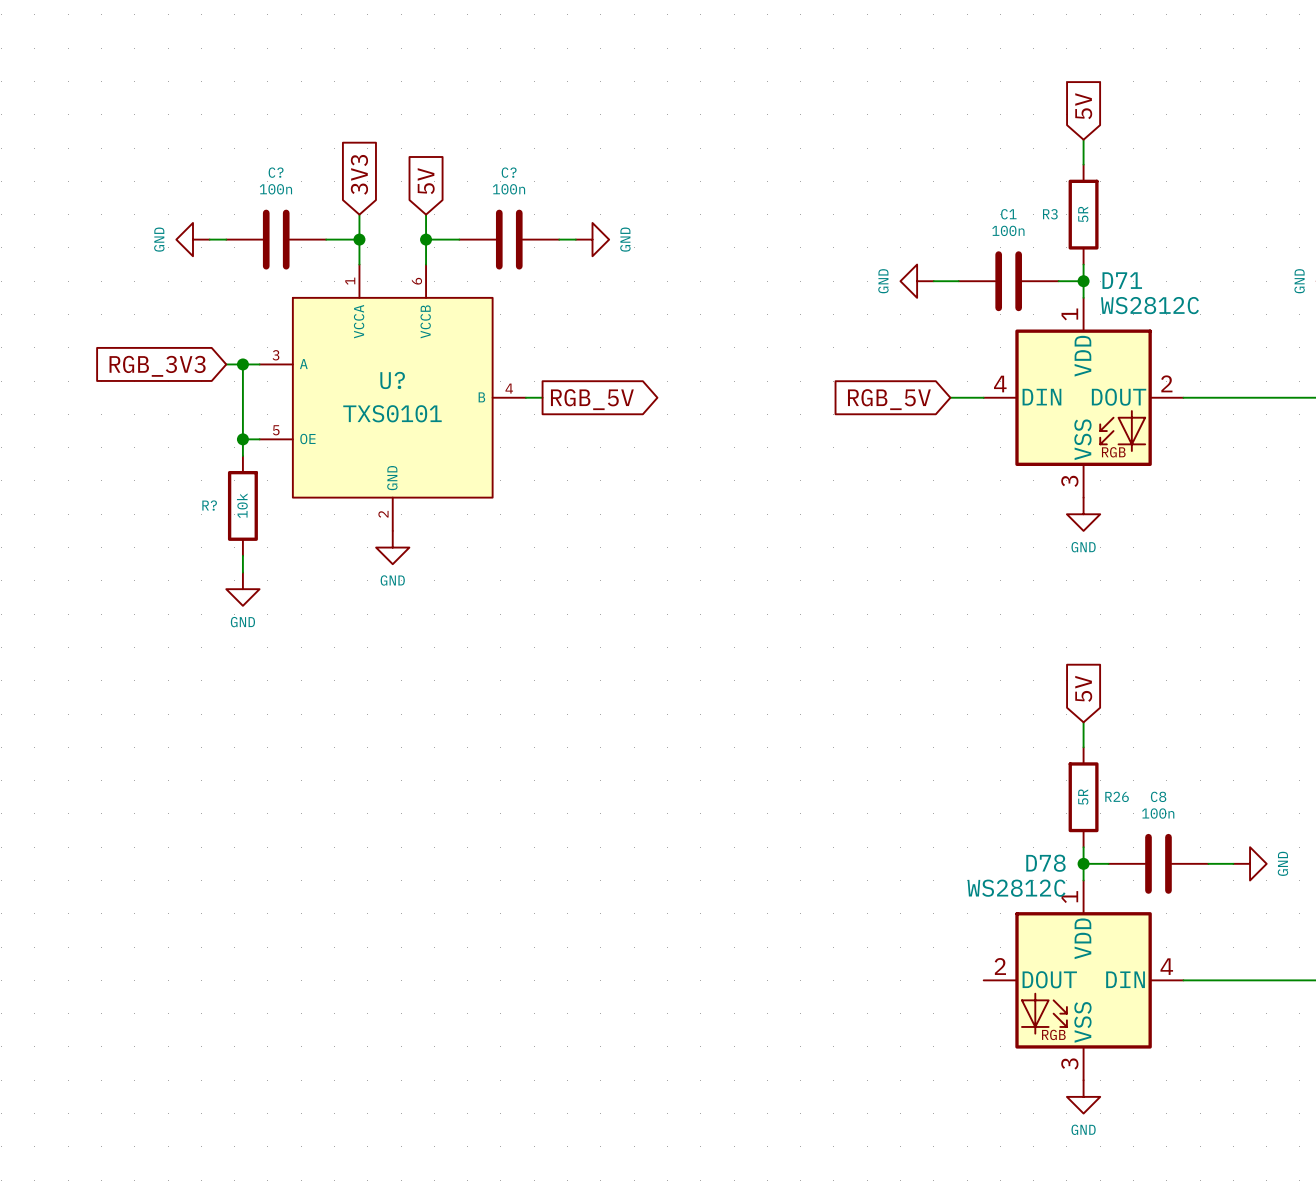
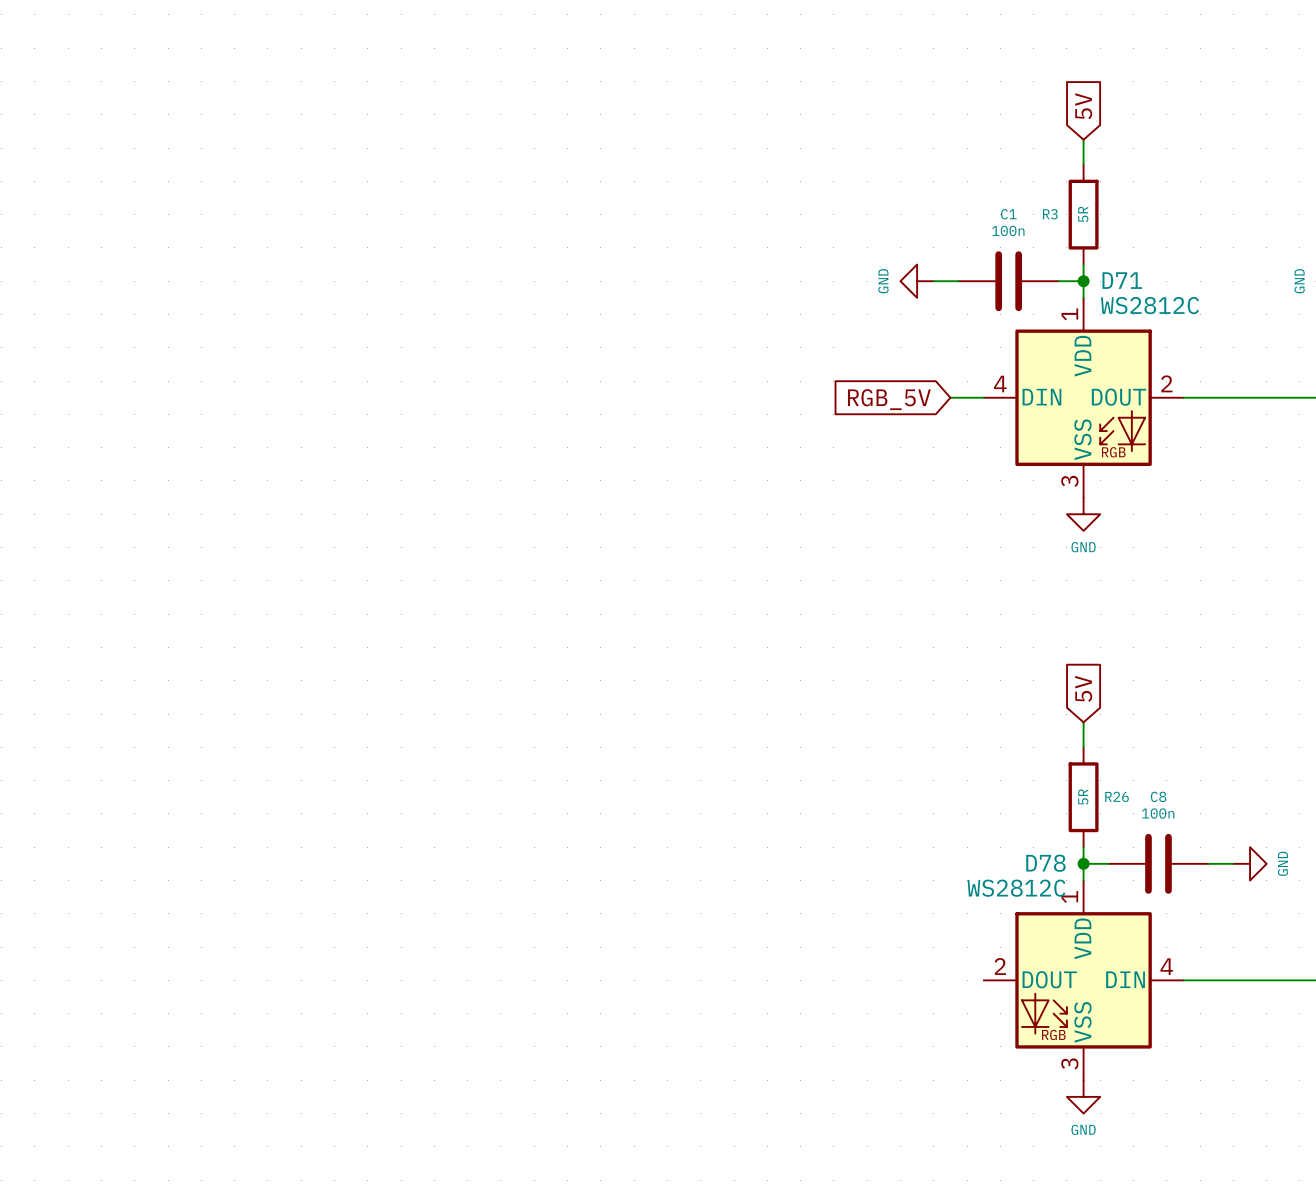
global label: 3V3 (359, 174) -> none
global label: 5V (426, 181) -> none
wire: (359, 214) (359, 264) -> none
wire: (426, 214) (426, 264) -> none
power symbol: GND (192, 239) -> none
wire: (209, 239) (226, 239) -> none
C?: 100n (276, 239) -> none
wire: (326, 239) (359, 239) -> none
junction: (359, 239) -> none
wire: (426, 239) (459, 239) -> none
junction: (426, 239) -> none
C?: 100n (509, 239) -> none
wire: (559, 239) (575, 239) -> none
power symbol: GND (592, 239) -> none
wire: (226, 364) (259, 364) -> none
wire: (242, 364) (242, 456) -> none
junction: (242, 364) -> none
global label: RGB_3V3 (157, 366) -> none
U?: TXS0101 (392, 397) -> none
wire: (525, 397) (542, 397) -> none
global label: RGB_5V (592, 399) -> none
wire: (242, 439) (259, 439) -> none
junction: (242, 439) -> none
R?: 10k (242, 505) -> none
power symbol: GND (392, 547) -> none
wire: (242, 555) (242, 572) -> none
power symbol: GND (242, 589) -> none

